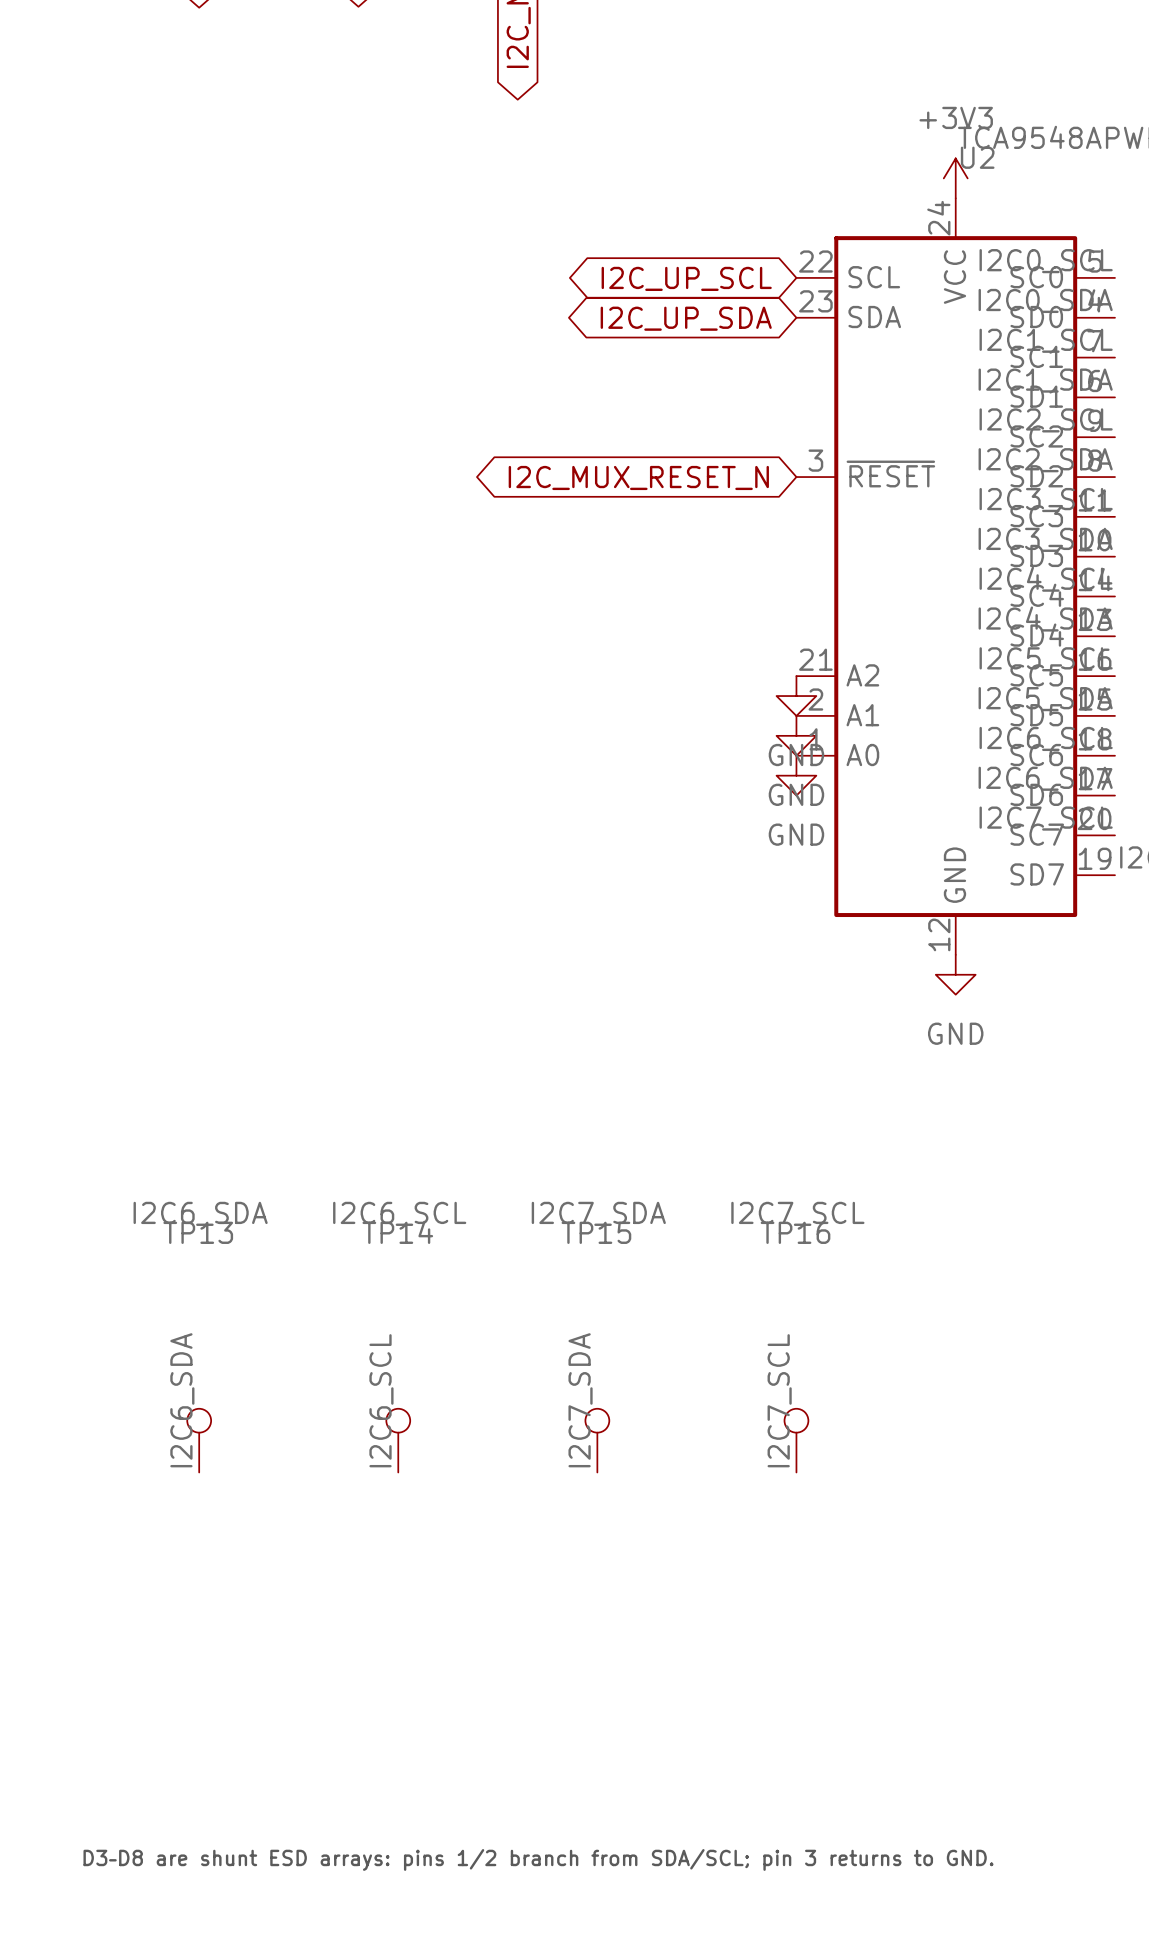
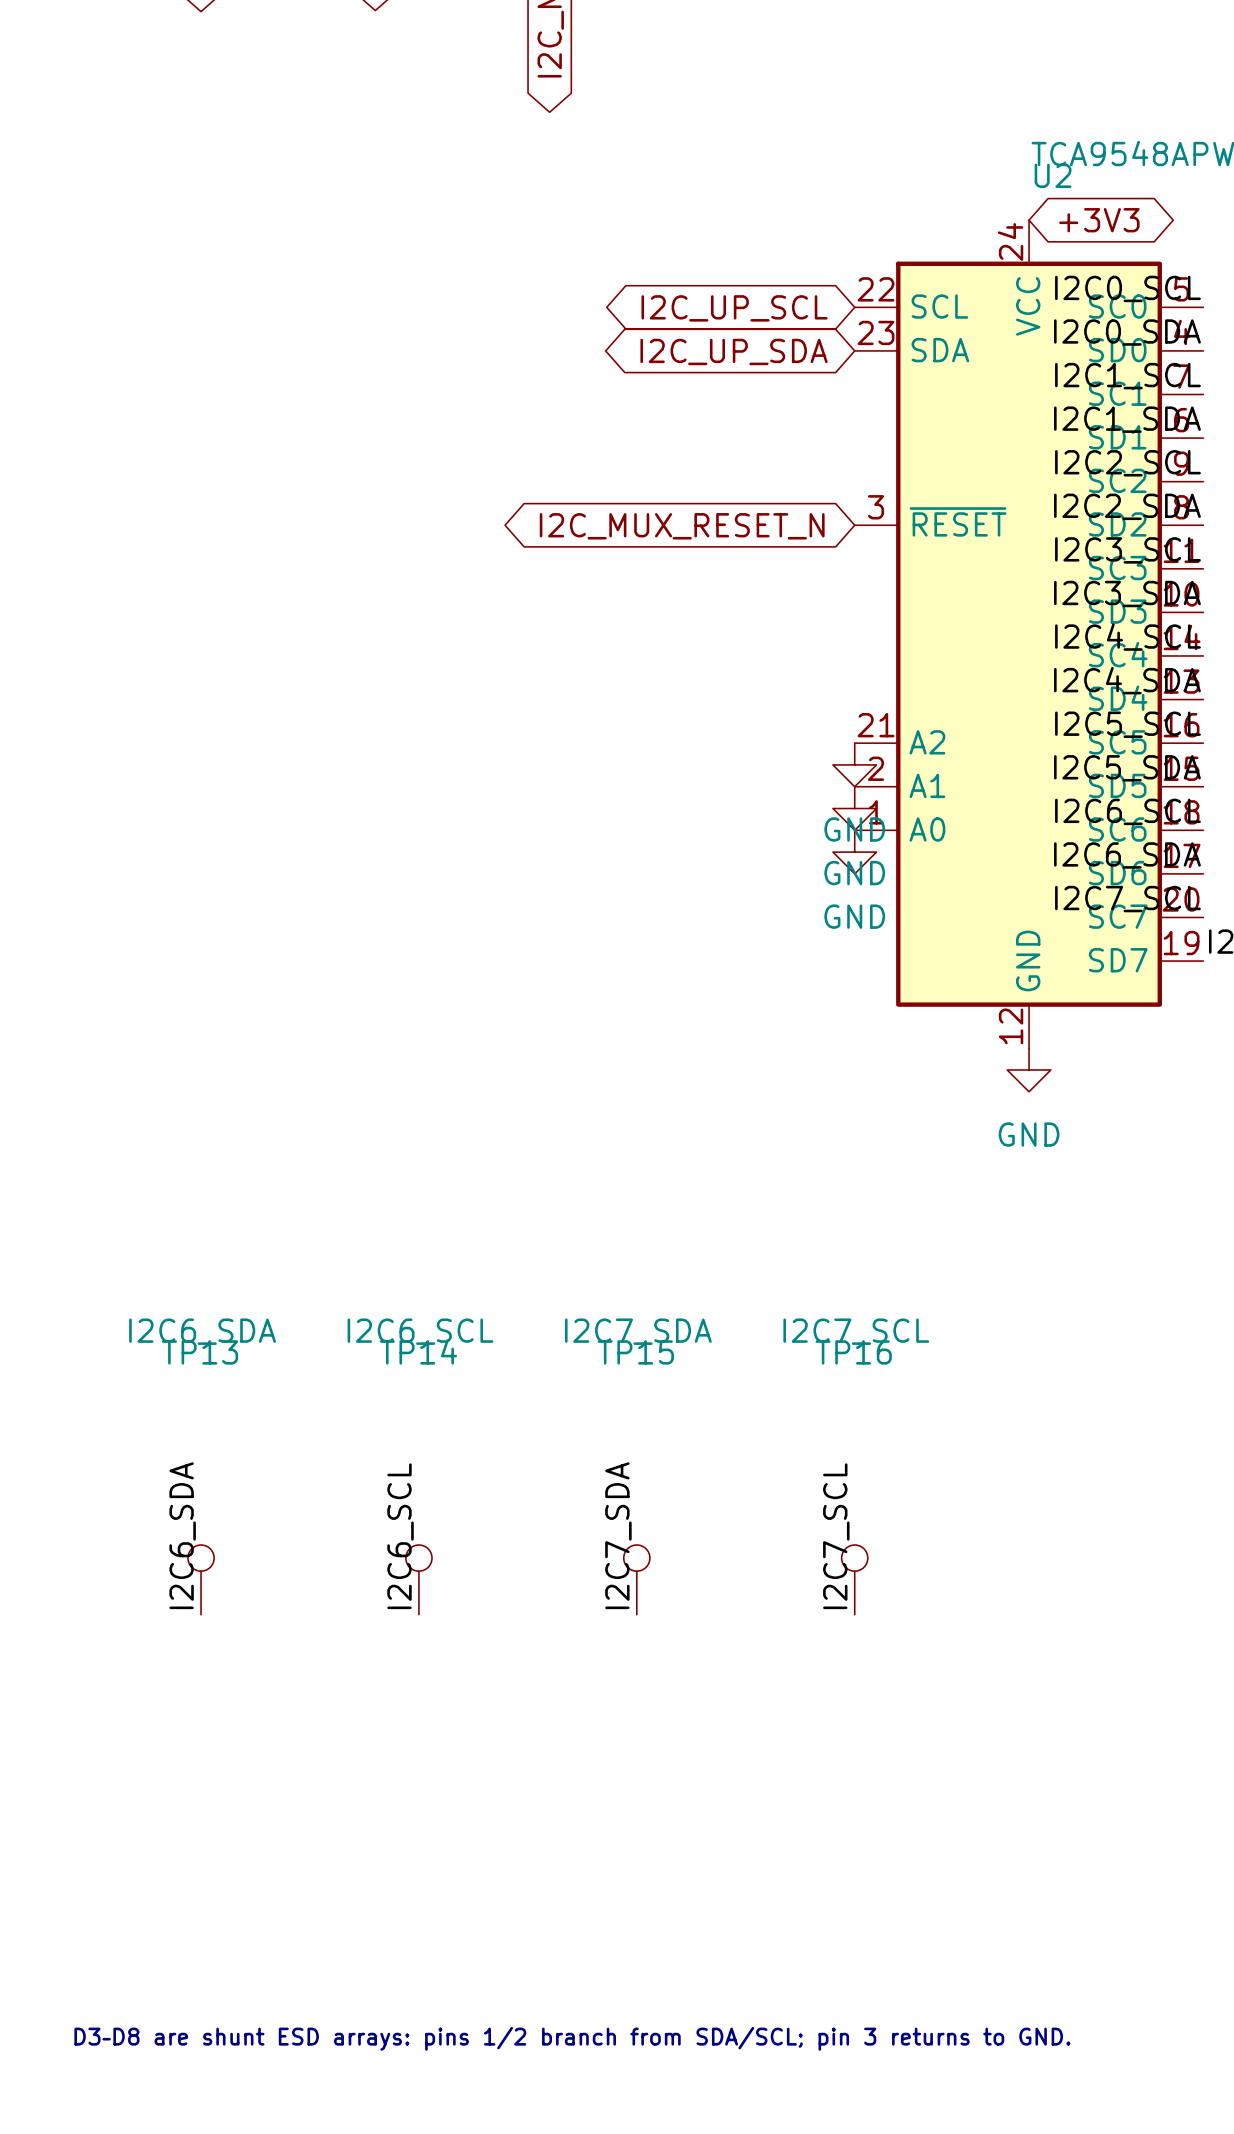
power symbol: +3V3 (955, 178) -> none
global label: none -> +3V3 (1099, 220)

